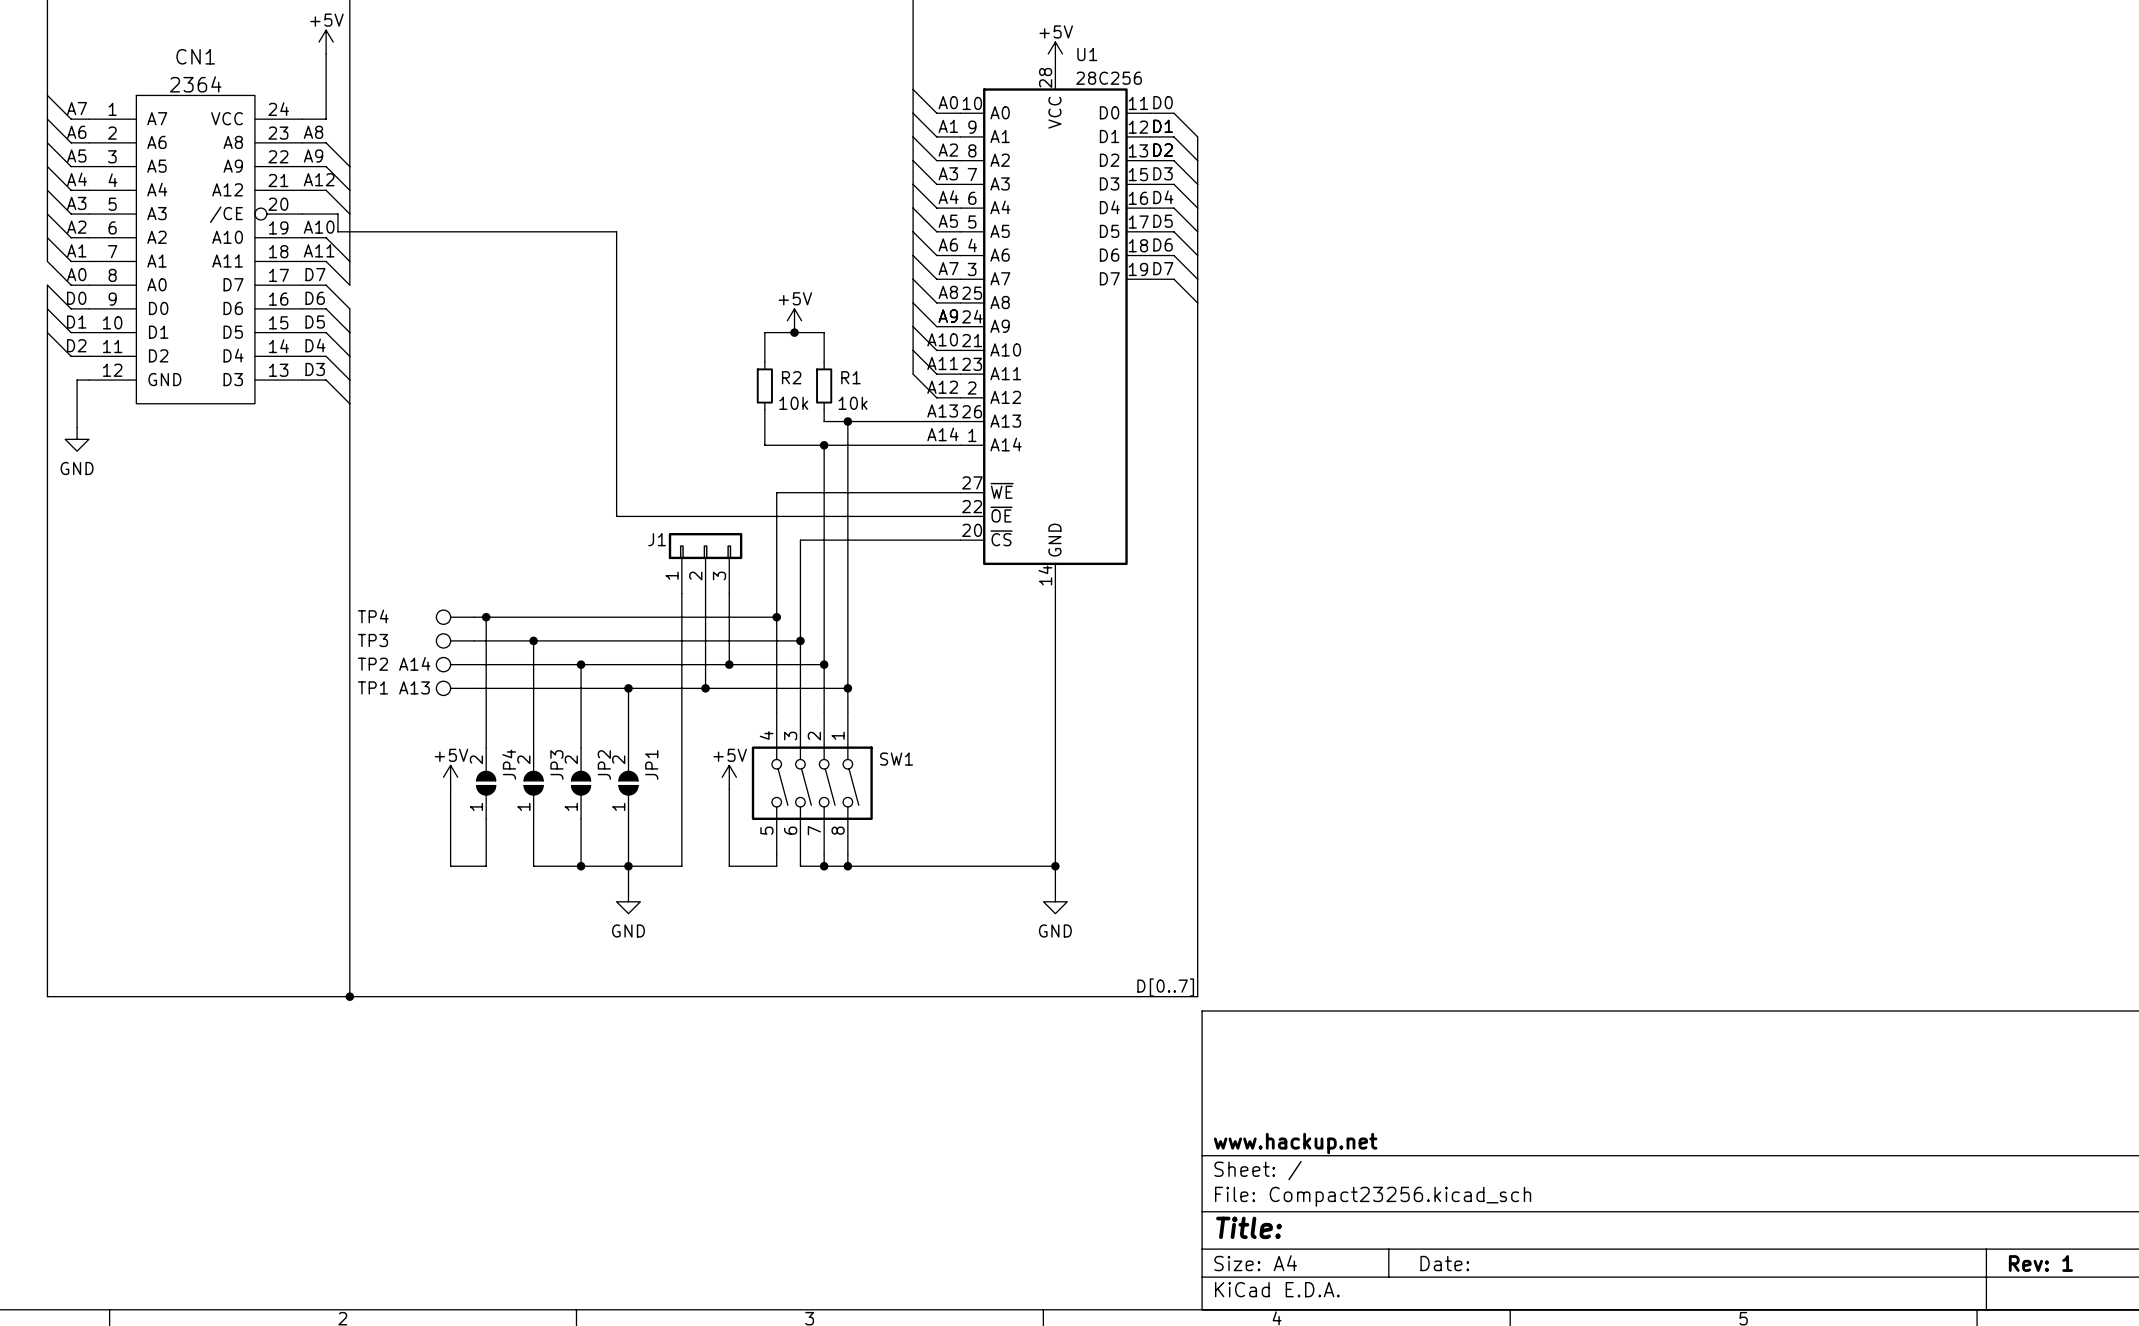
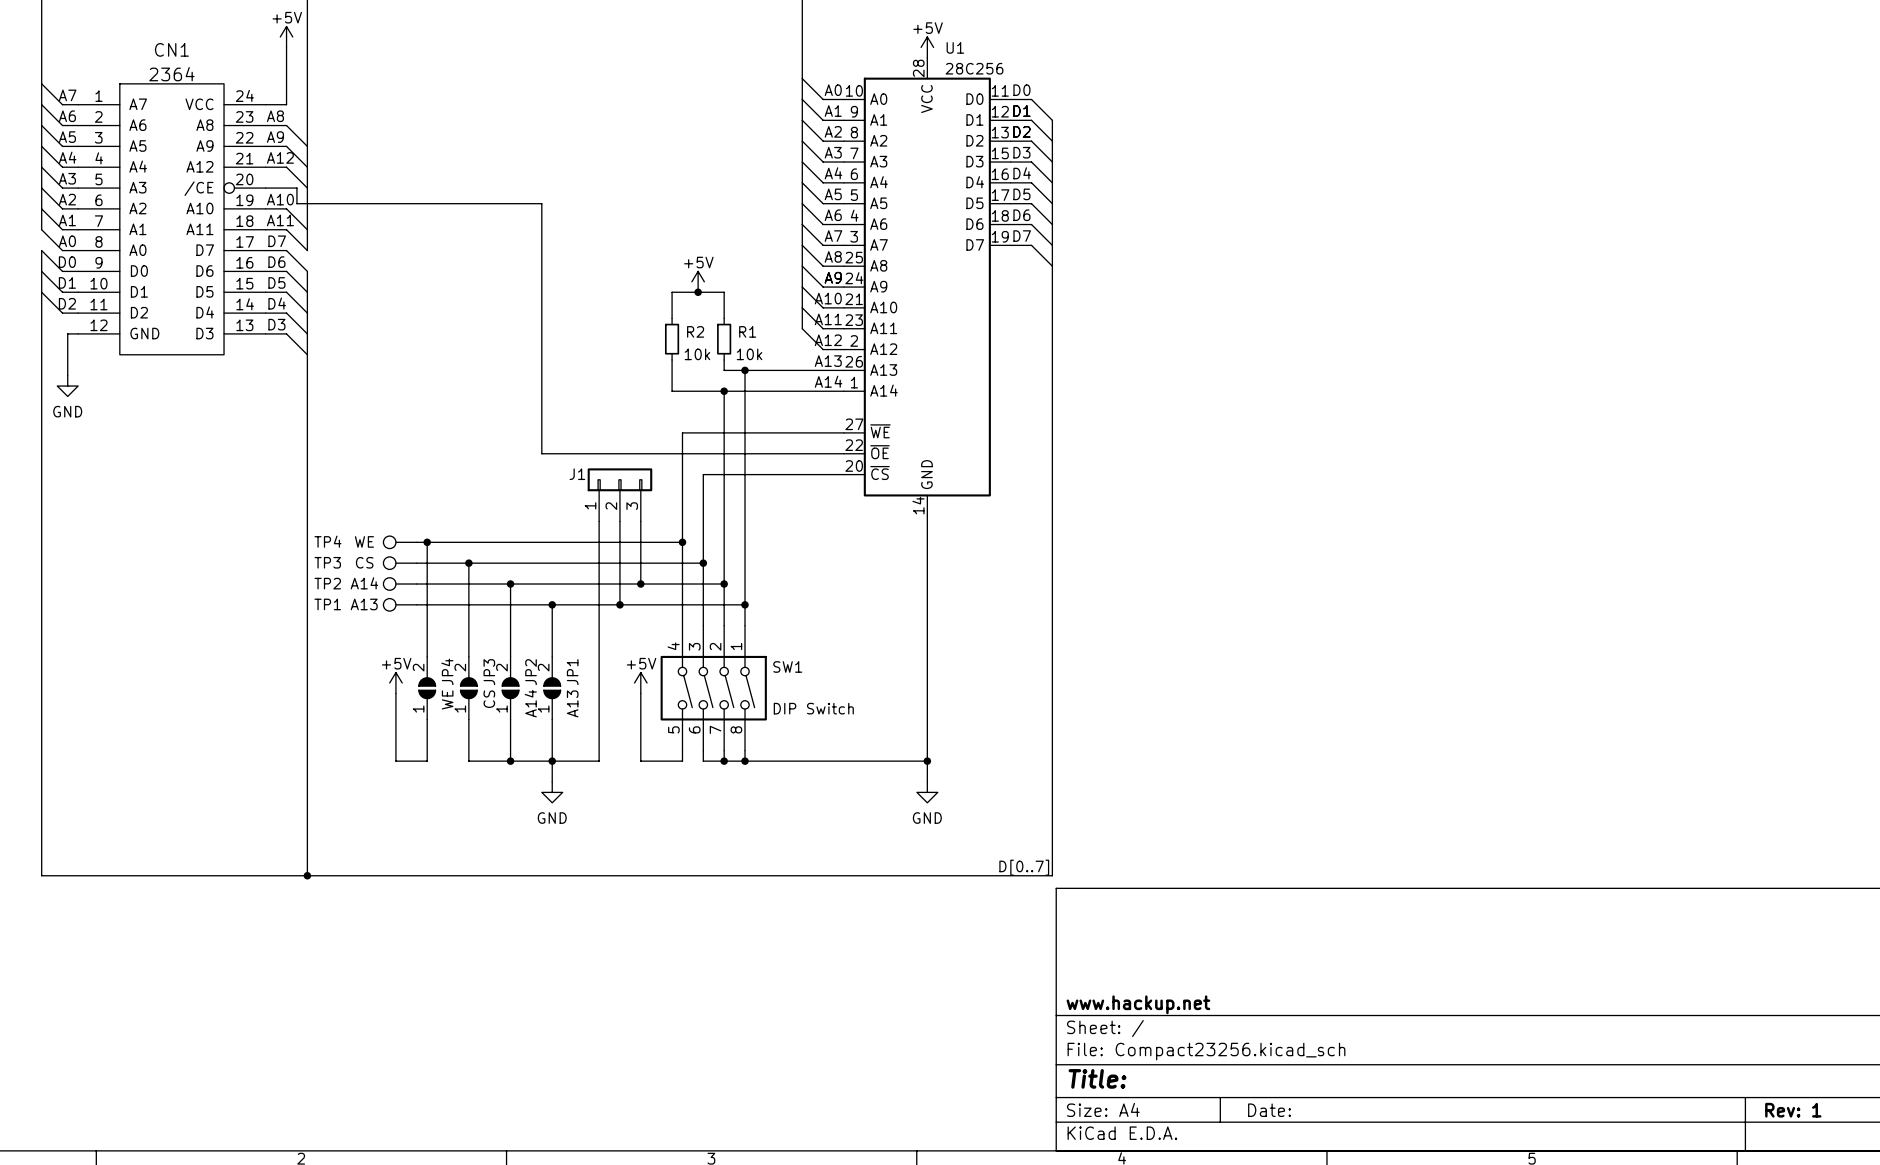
TP4 value: none -> WE (364, 541)
TP3 value: none -> CS (364, 562)
JP3 value: none -> CS (489, 699)
JP4 value: none -> WE (447, 699)
JP2 value: none -> A14 (530, 703)
JP1 value: none -> A13 (572, 703)
SW1 value: none -> DIP Switch (813, 708)

